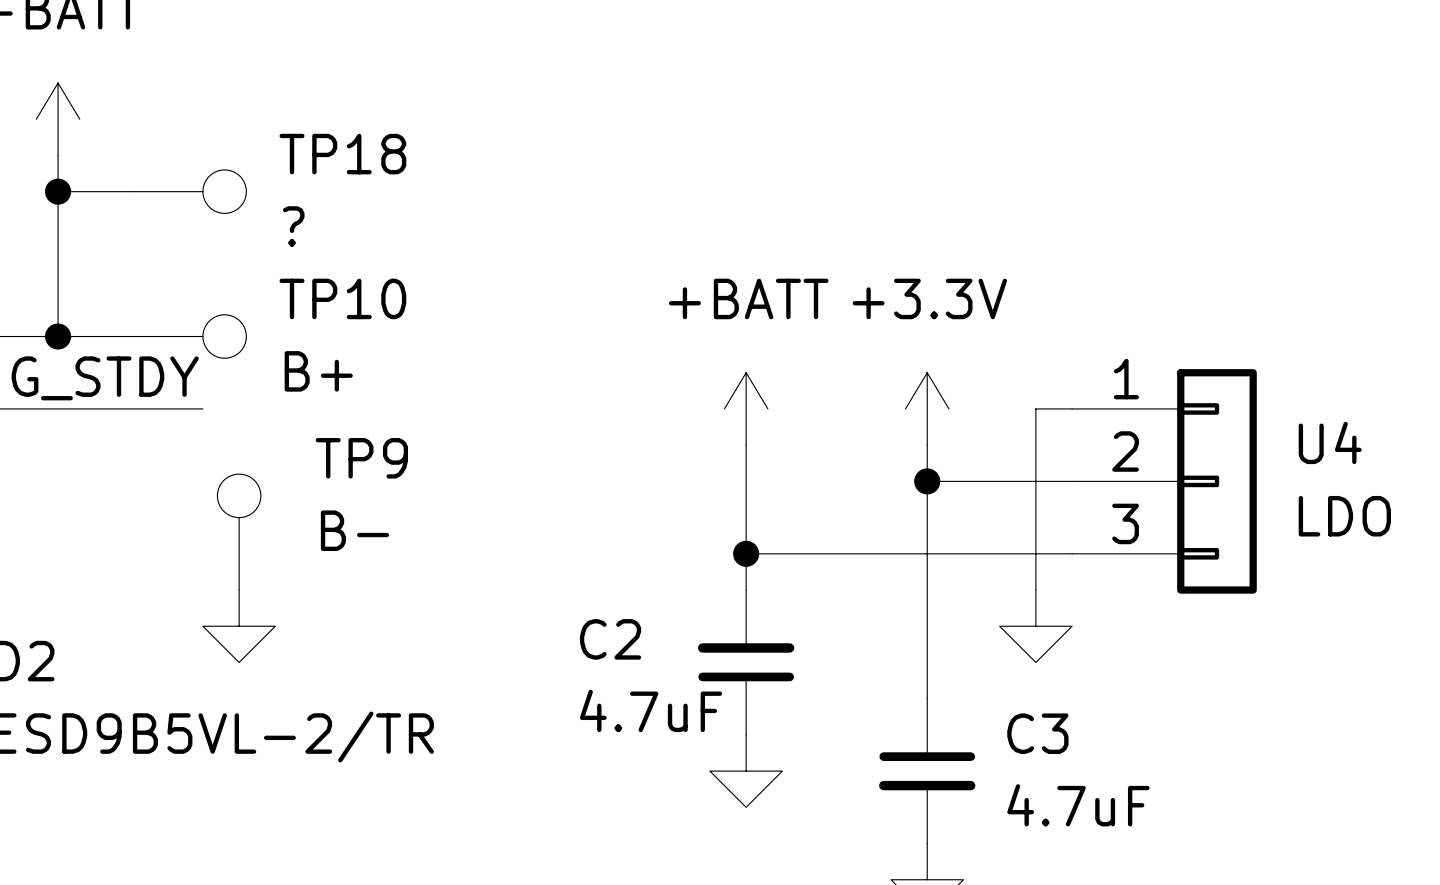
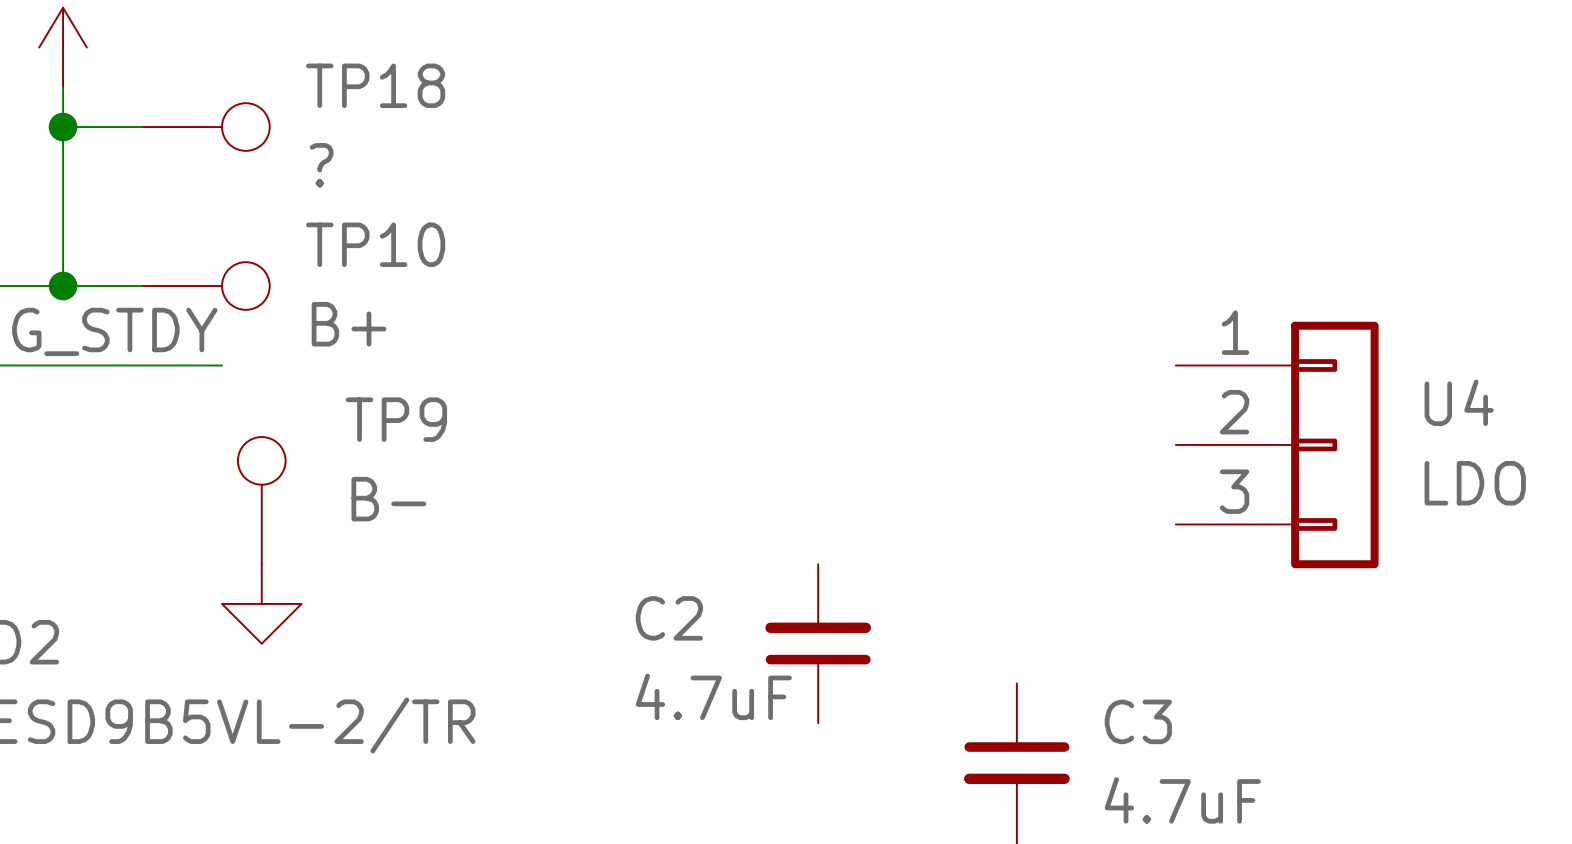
power symbol: +BATT (746, 408) -> none
power symbol: +3.3V (927, 408) -> none
wire: (1072, 408) (1035, 408) (1035, 590) -> none
wire: (746, 445) (746, 590) -> none
wire: (927, 445) (927, 698) -> none
wire: (927, 481) (1072, 481) -> none
junction: (927, 481) -> none
wire: (746, 553) (1072, 553) -> none
junction: (746, 553) -> none
power symbol: (1035, 626) -> none
power symbol: (746, 771) -> none

